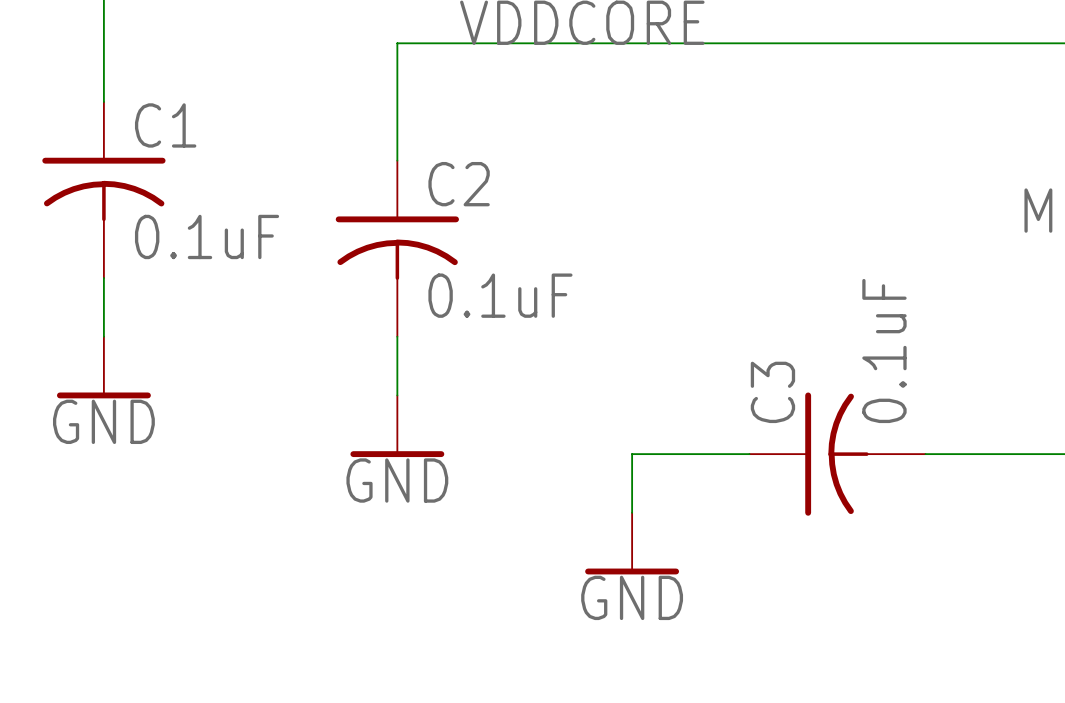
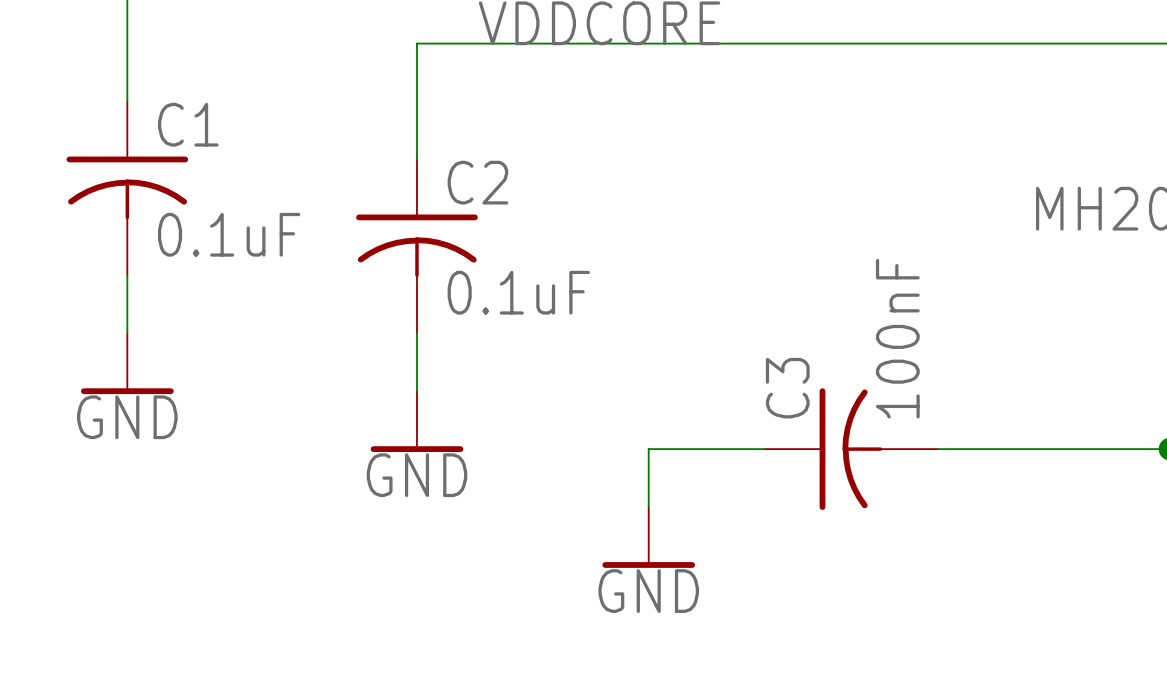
C3 value: 0.1uF (884, 351) -> 100nF (897, 338)

